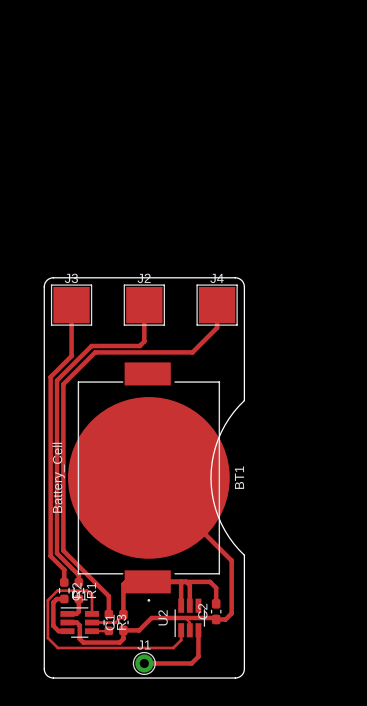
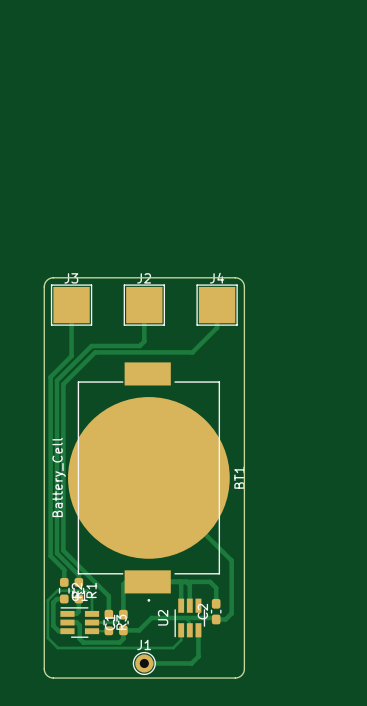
board edge: (244, 400) (229, 418) (221, 432) (213, 454) (210, 477) (213, 501) (221, 523) (233, 543) (244, 555) -> (244, 400) (244, 555)

